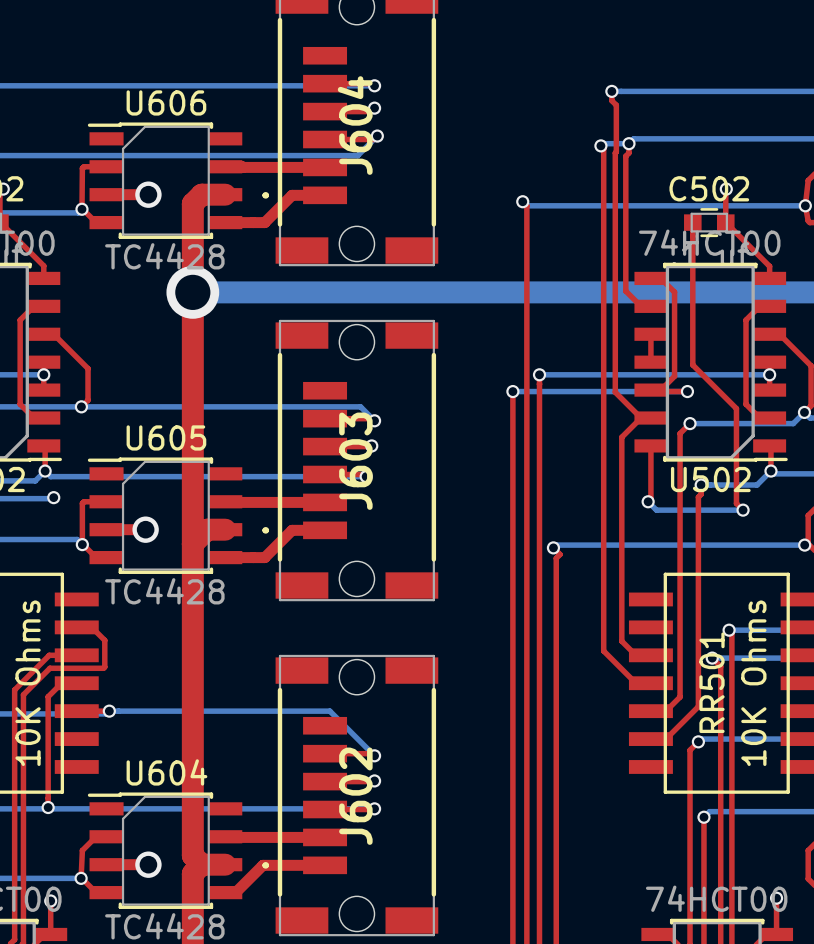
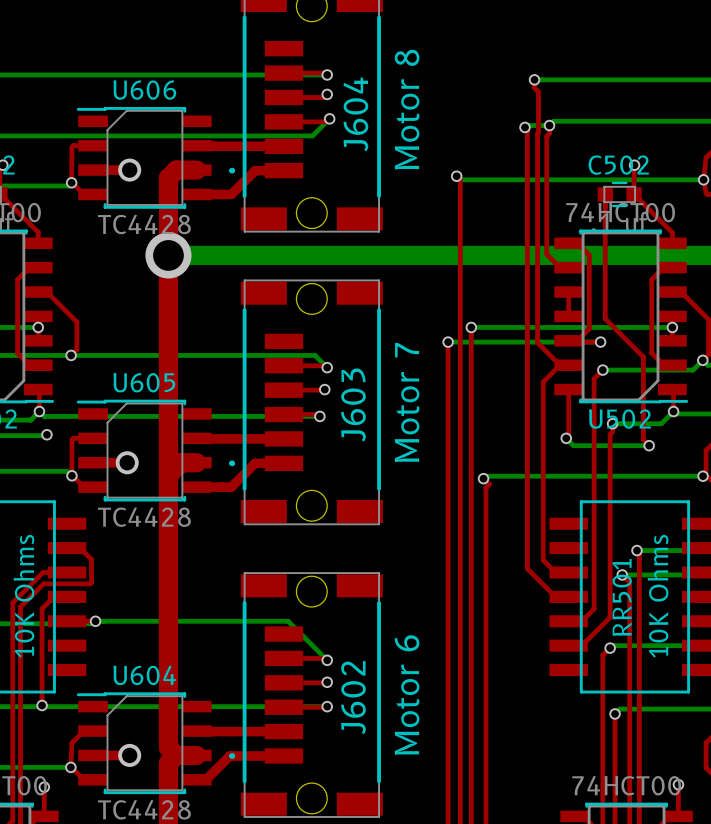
J604 value: none -> Motor 8 (407, 109)
J604 name position: J604 (355, 125) -> J604 (355, 114)
J603 value: none -> Motor 7 (407, 402)
J603 name position: J603 (355, 461) -> J603 (353, 405)
J602 value: none -> Motor 6 (407, 695)
J602 name position: J602 (355, 796) -> J602 (353, 697)

